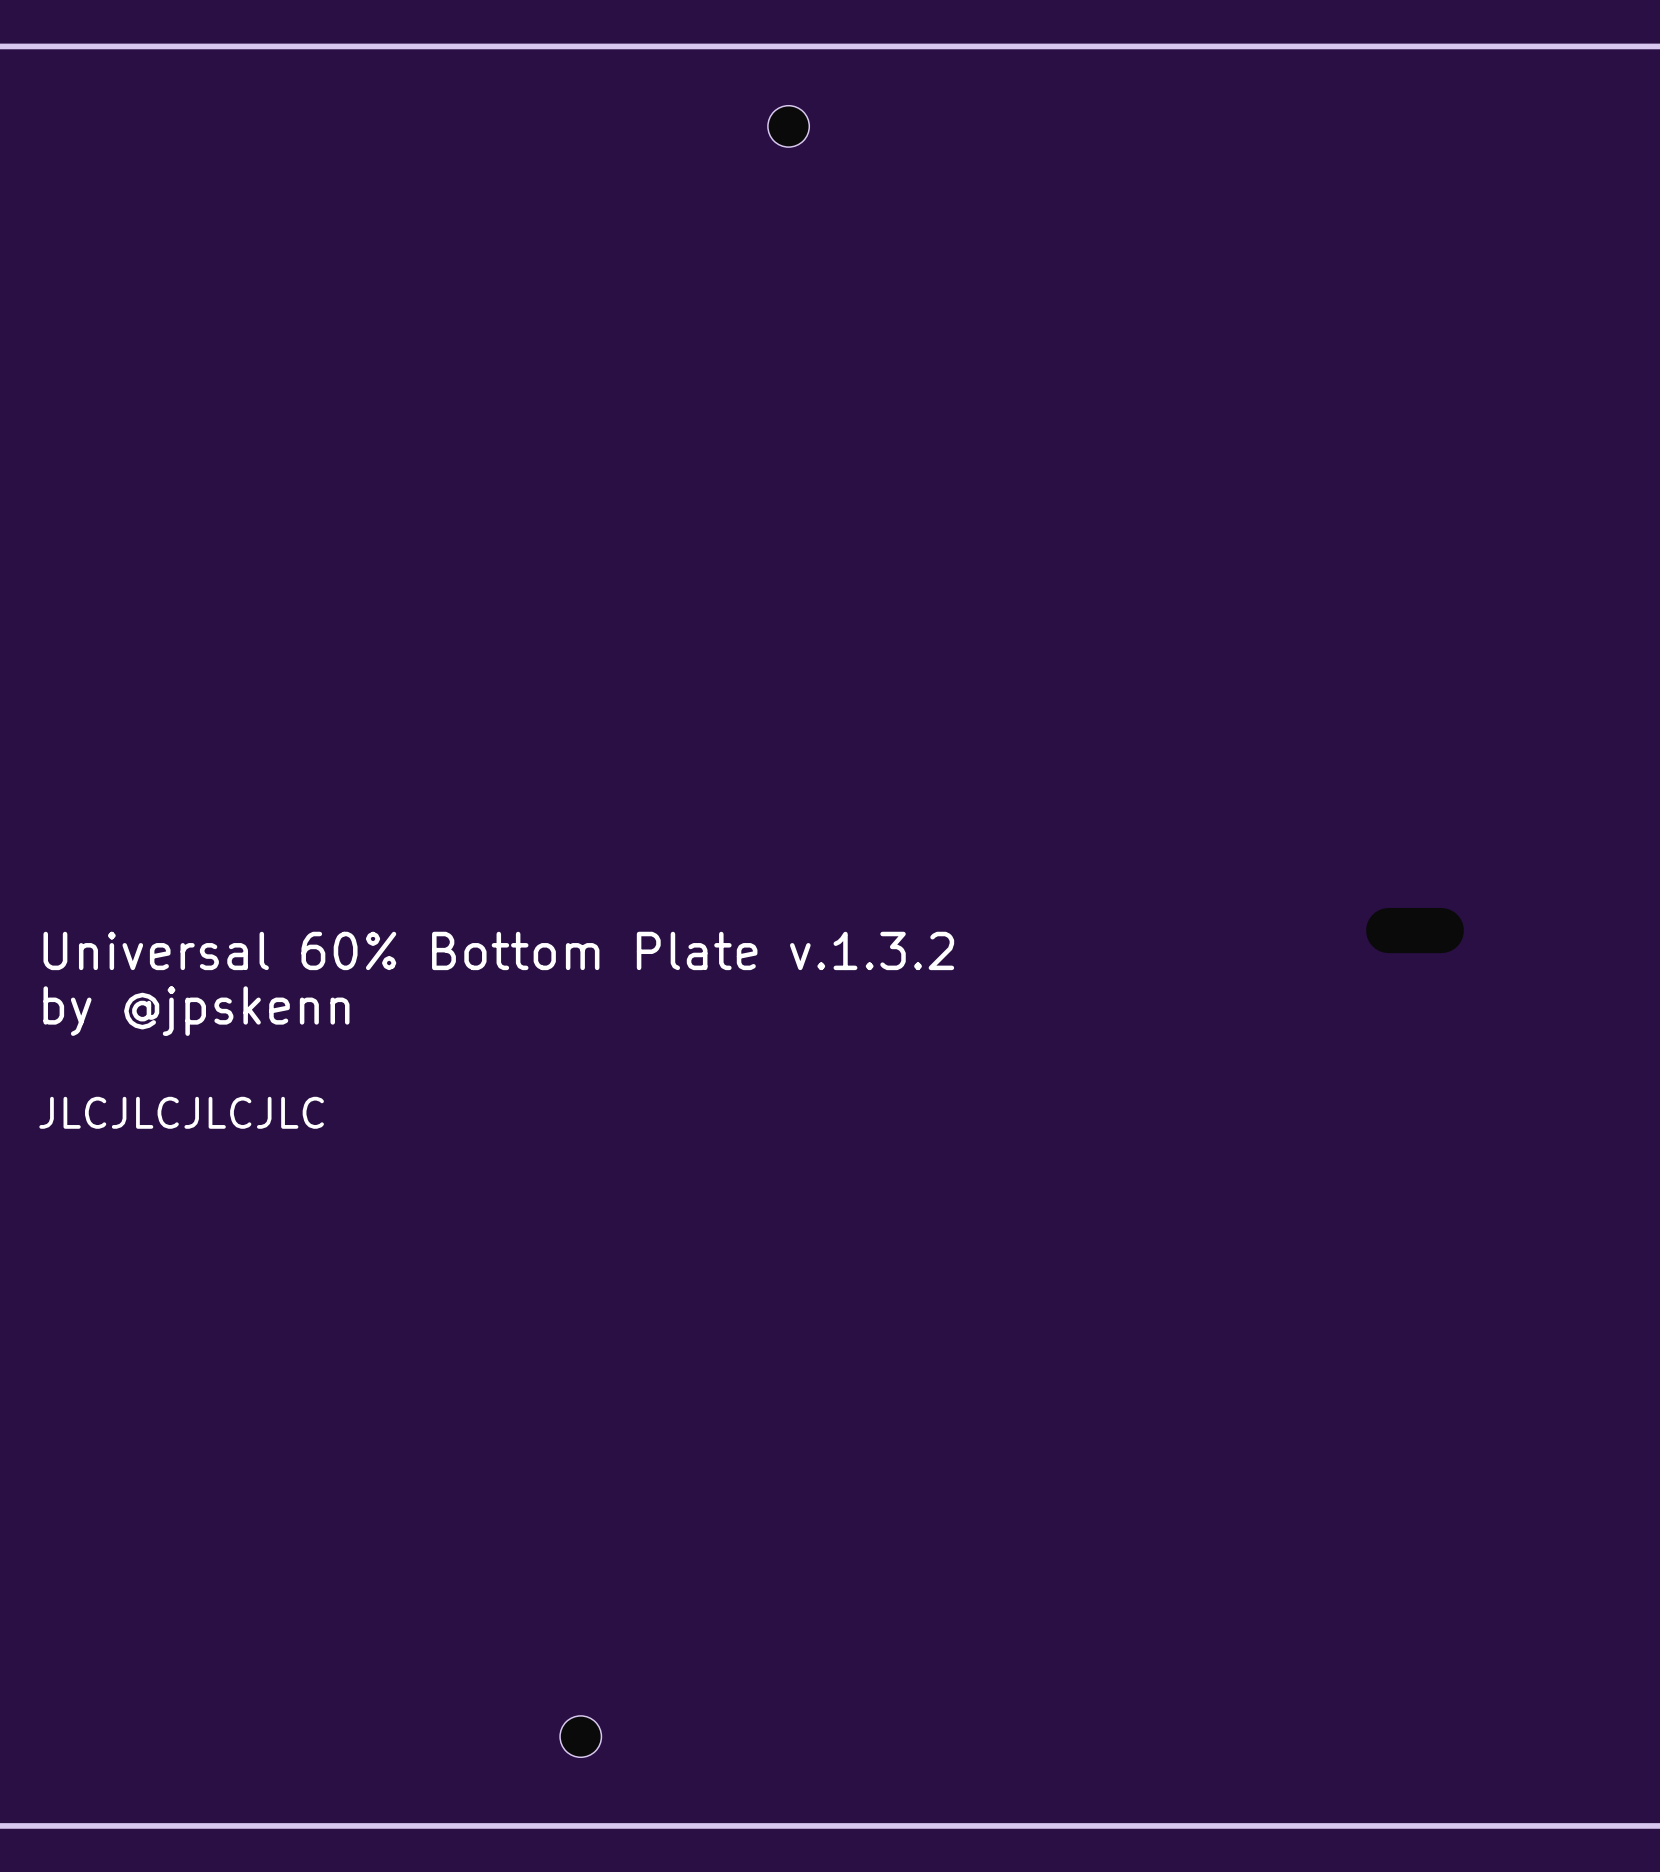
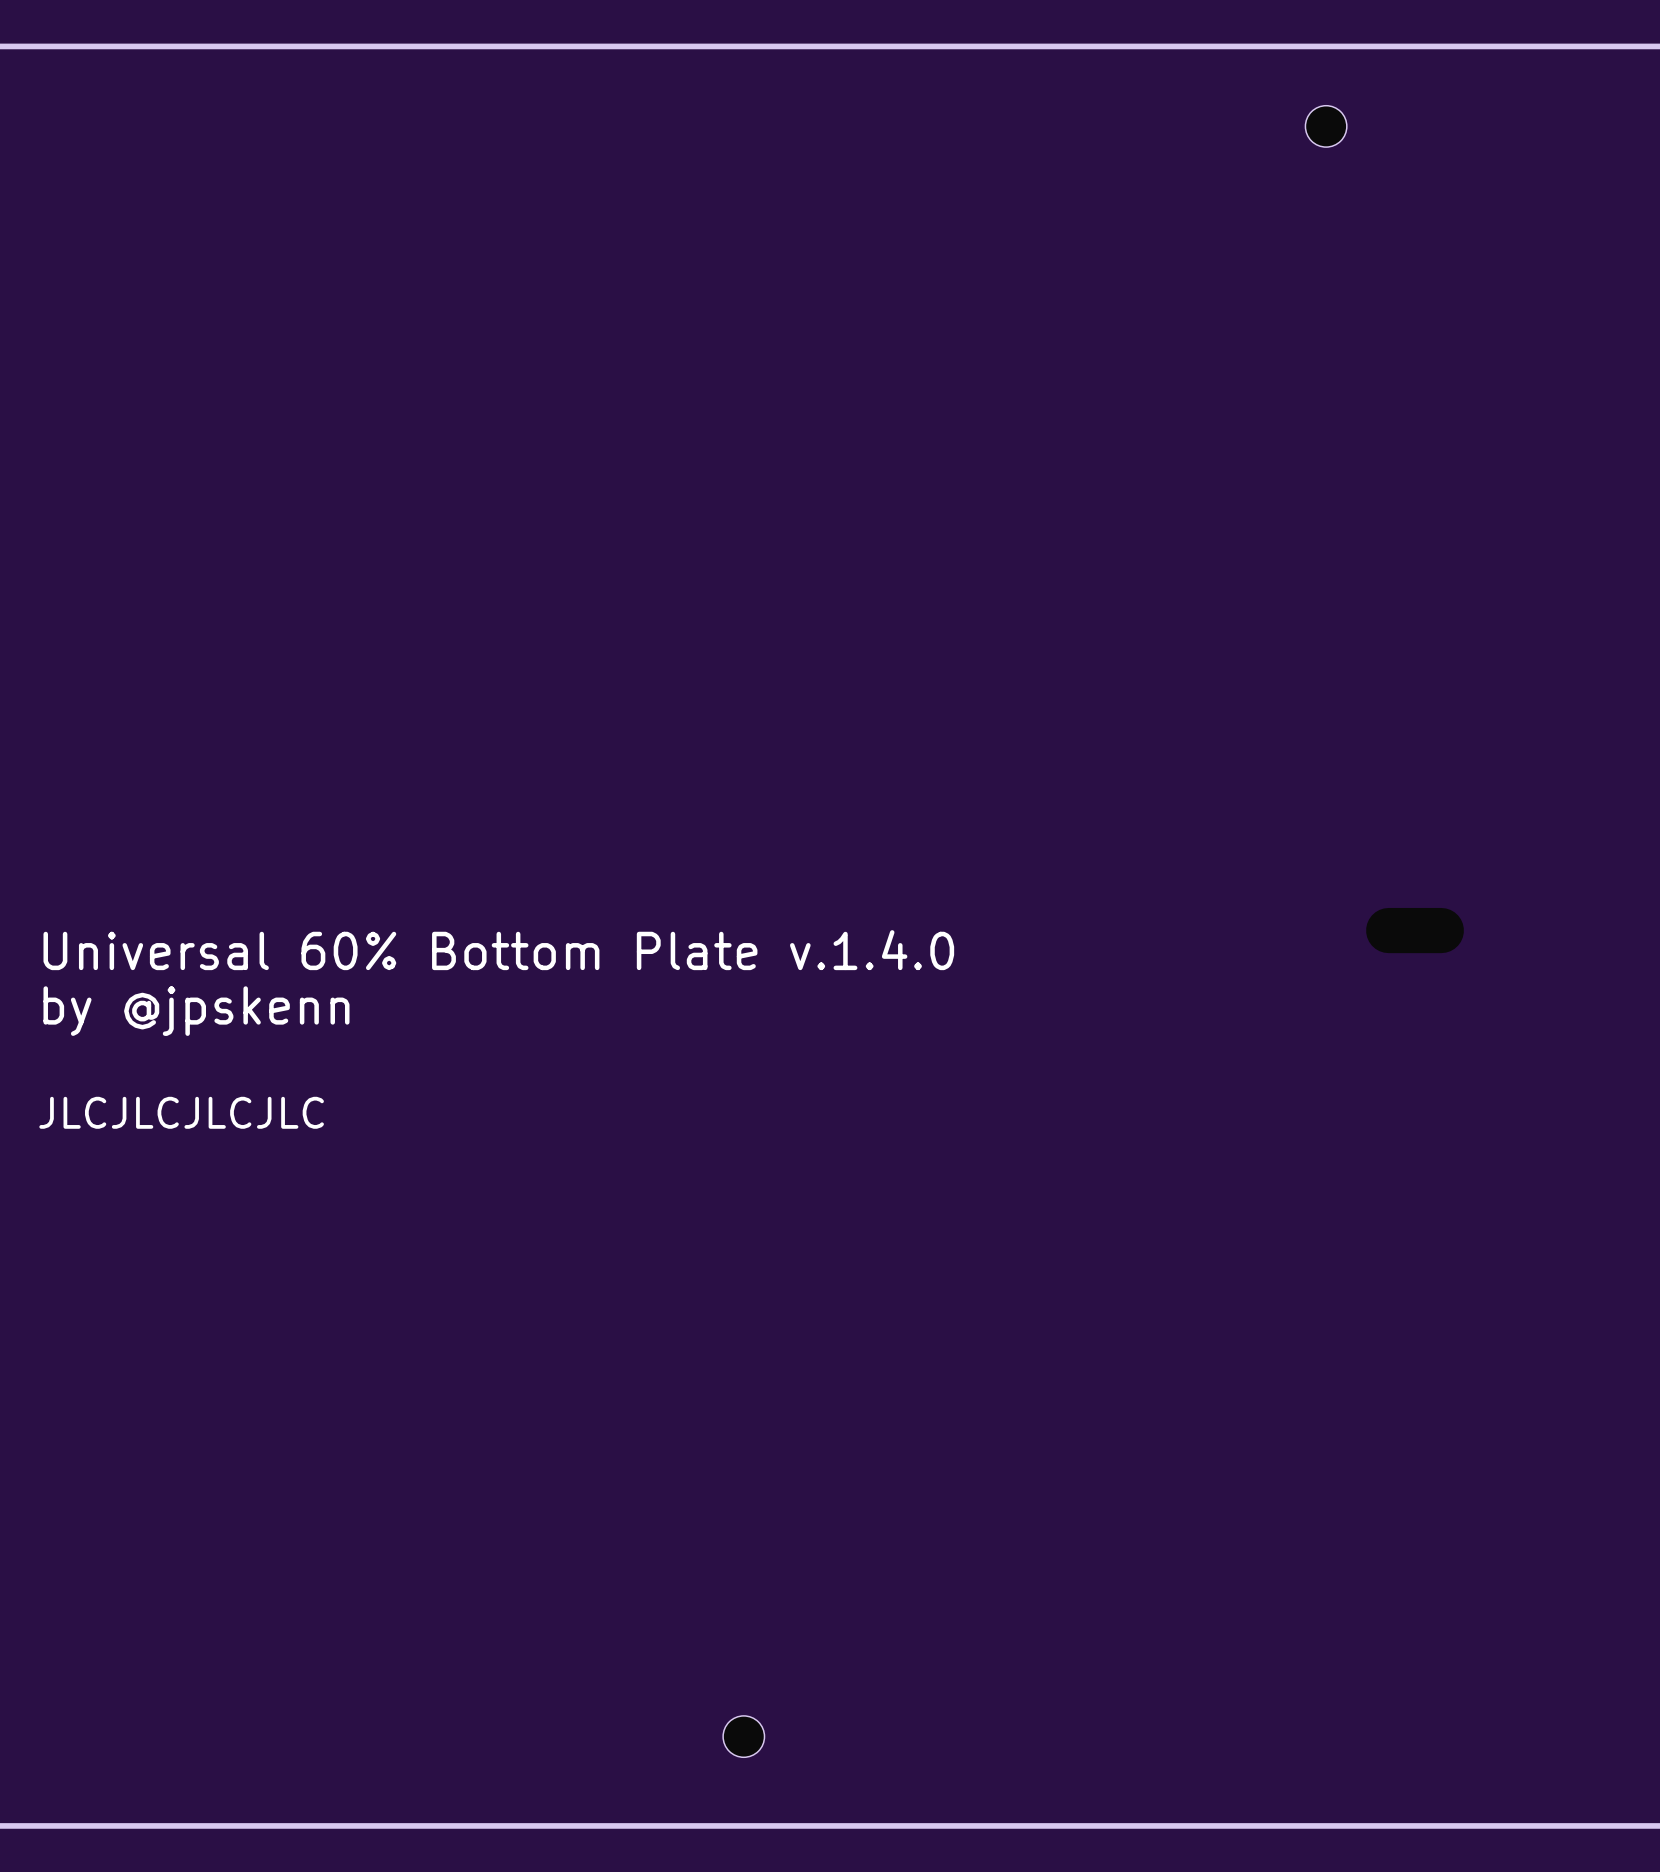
part: (788, 126) -> none
part: none -> (1326, 126)
text: Universal 60% Bottom Plate v.1.3.2 (498, 950) -> Universal 60% Bottom Plate v.1.4.0 (498, 950)
part position: (580, 1736) -> (743, 1736)

